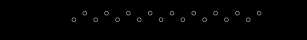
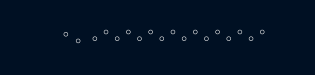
via: (84, 13) -> none
via: none -> (65, 34)
via: (73, 19) -> none
via: none -> (78, 40)

